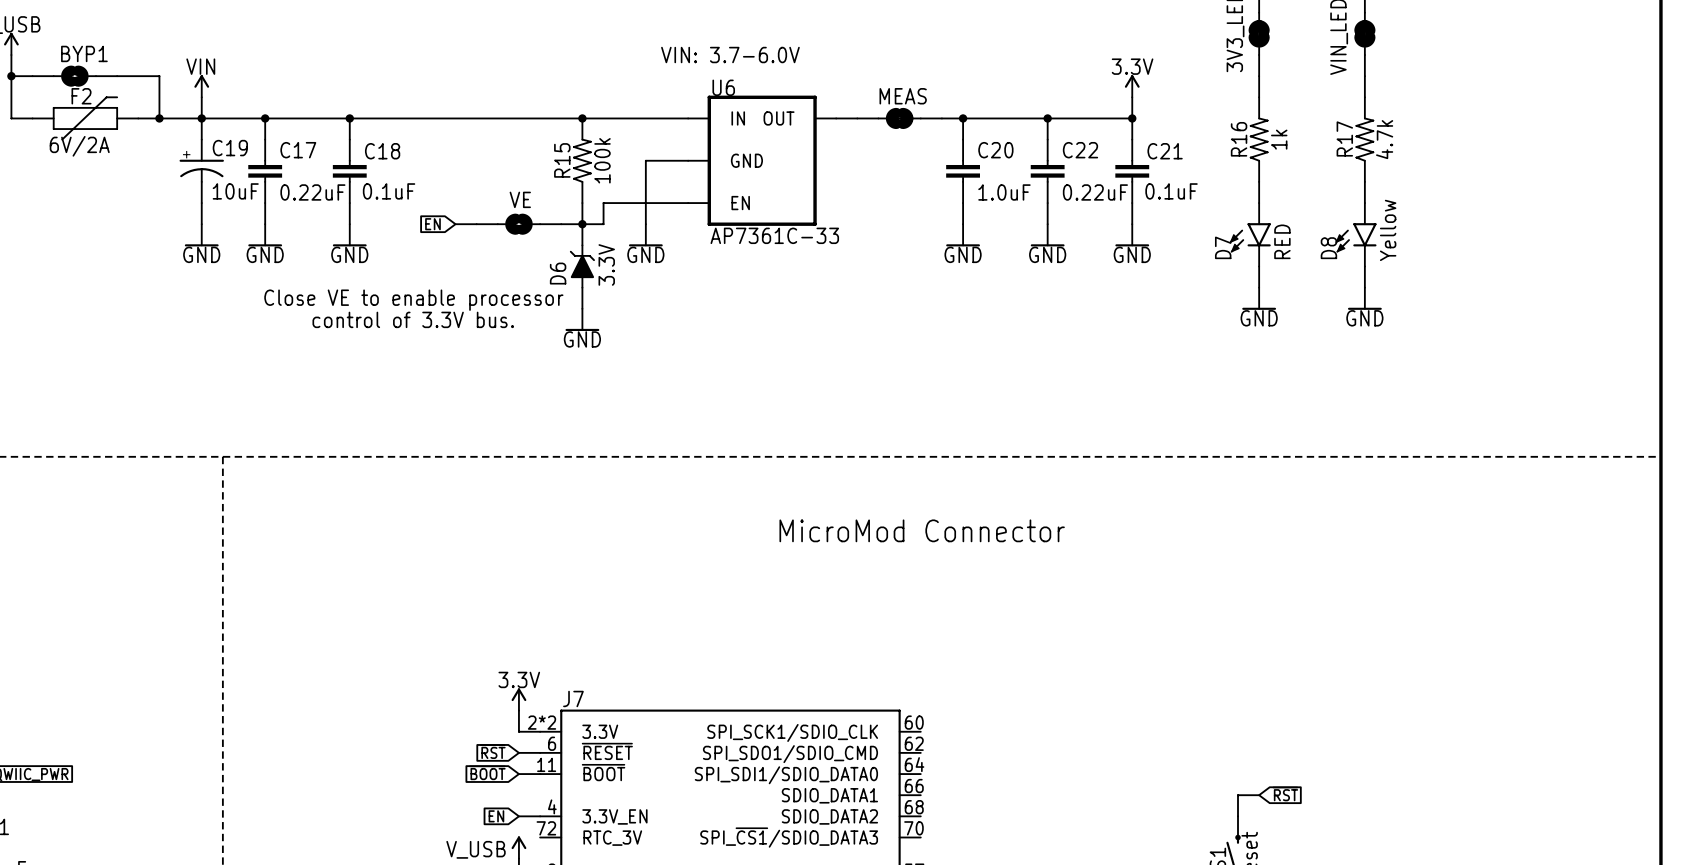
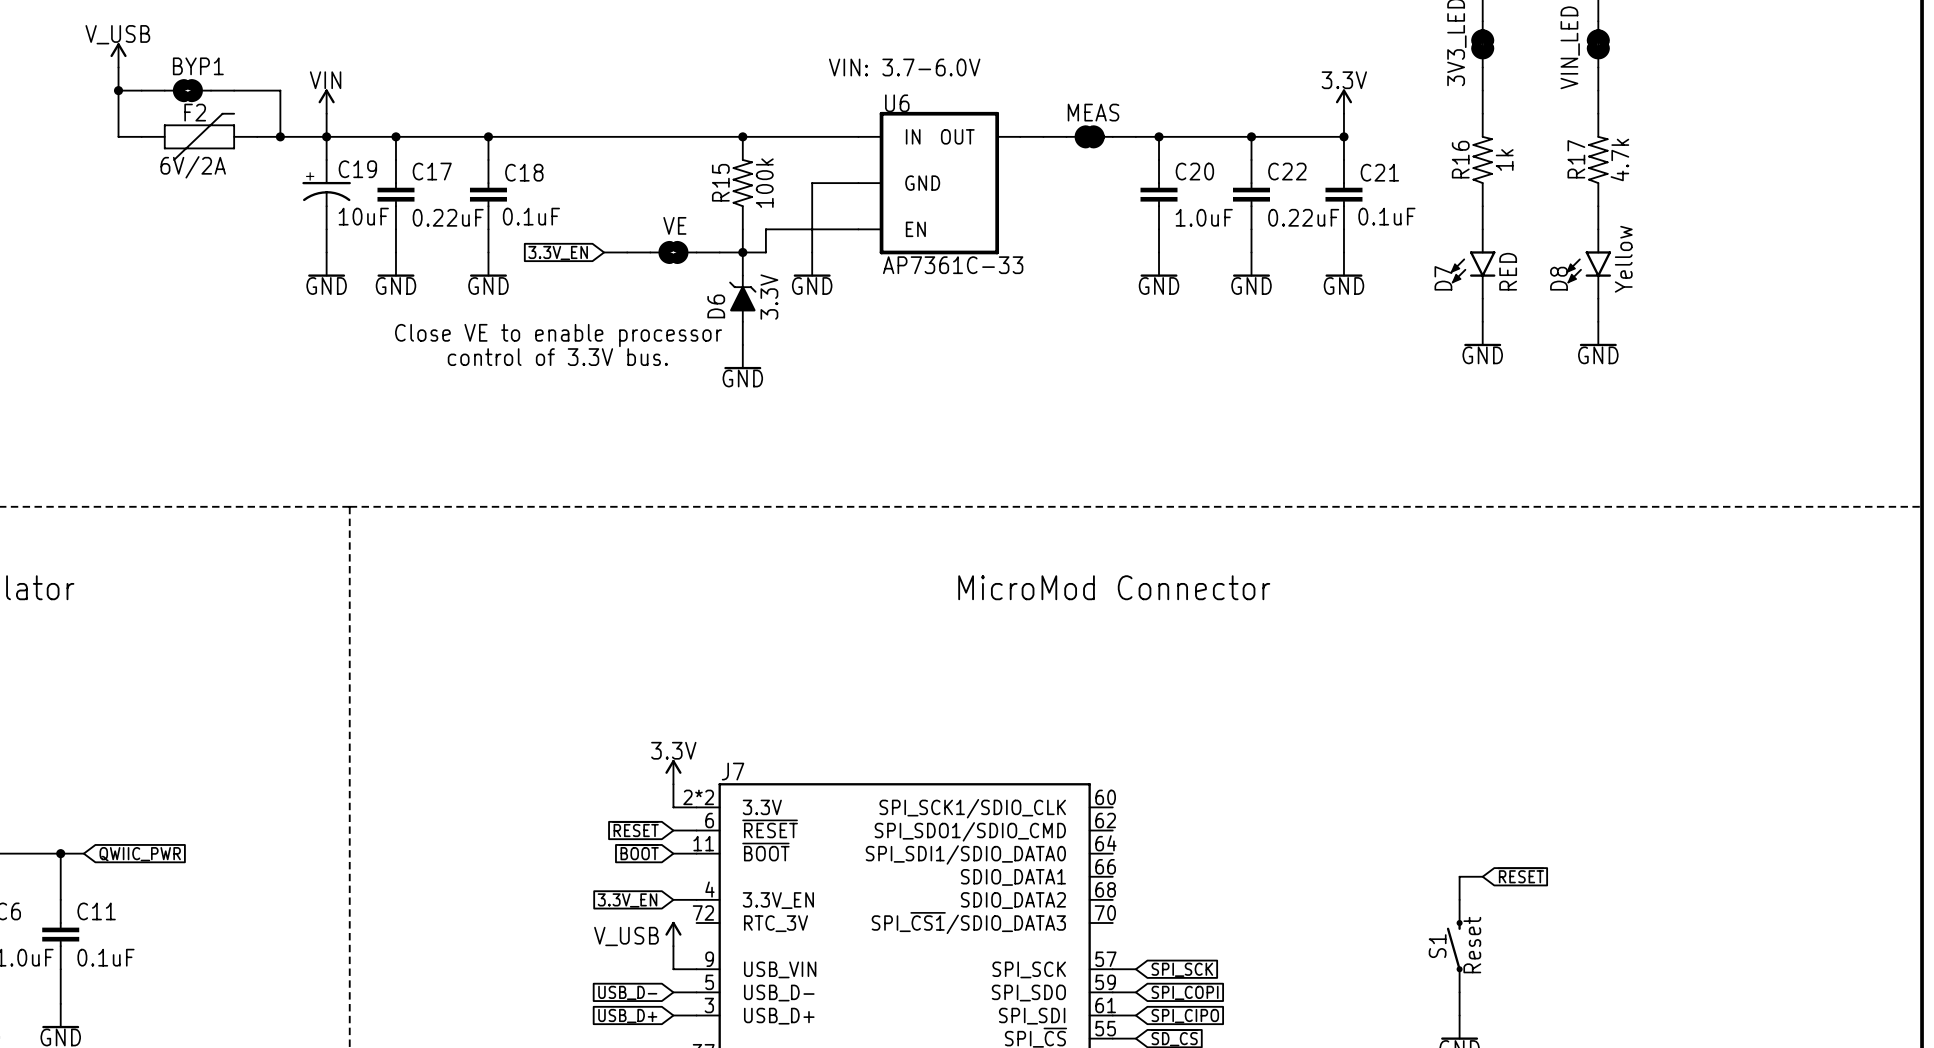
global label: EN (432, 224) -> 3.3V_EN (558, 253)
global label: ~{RST} (492, 751) -> ~{RESET} (635, 829)
global label: ~{RST} (1285, 793) -> ~{RESET} (1520, 875)
global label: EN (496, 816) -> 3.3V_EN (627, 900)

